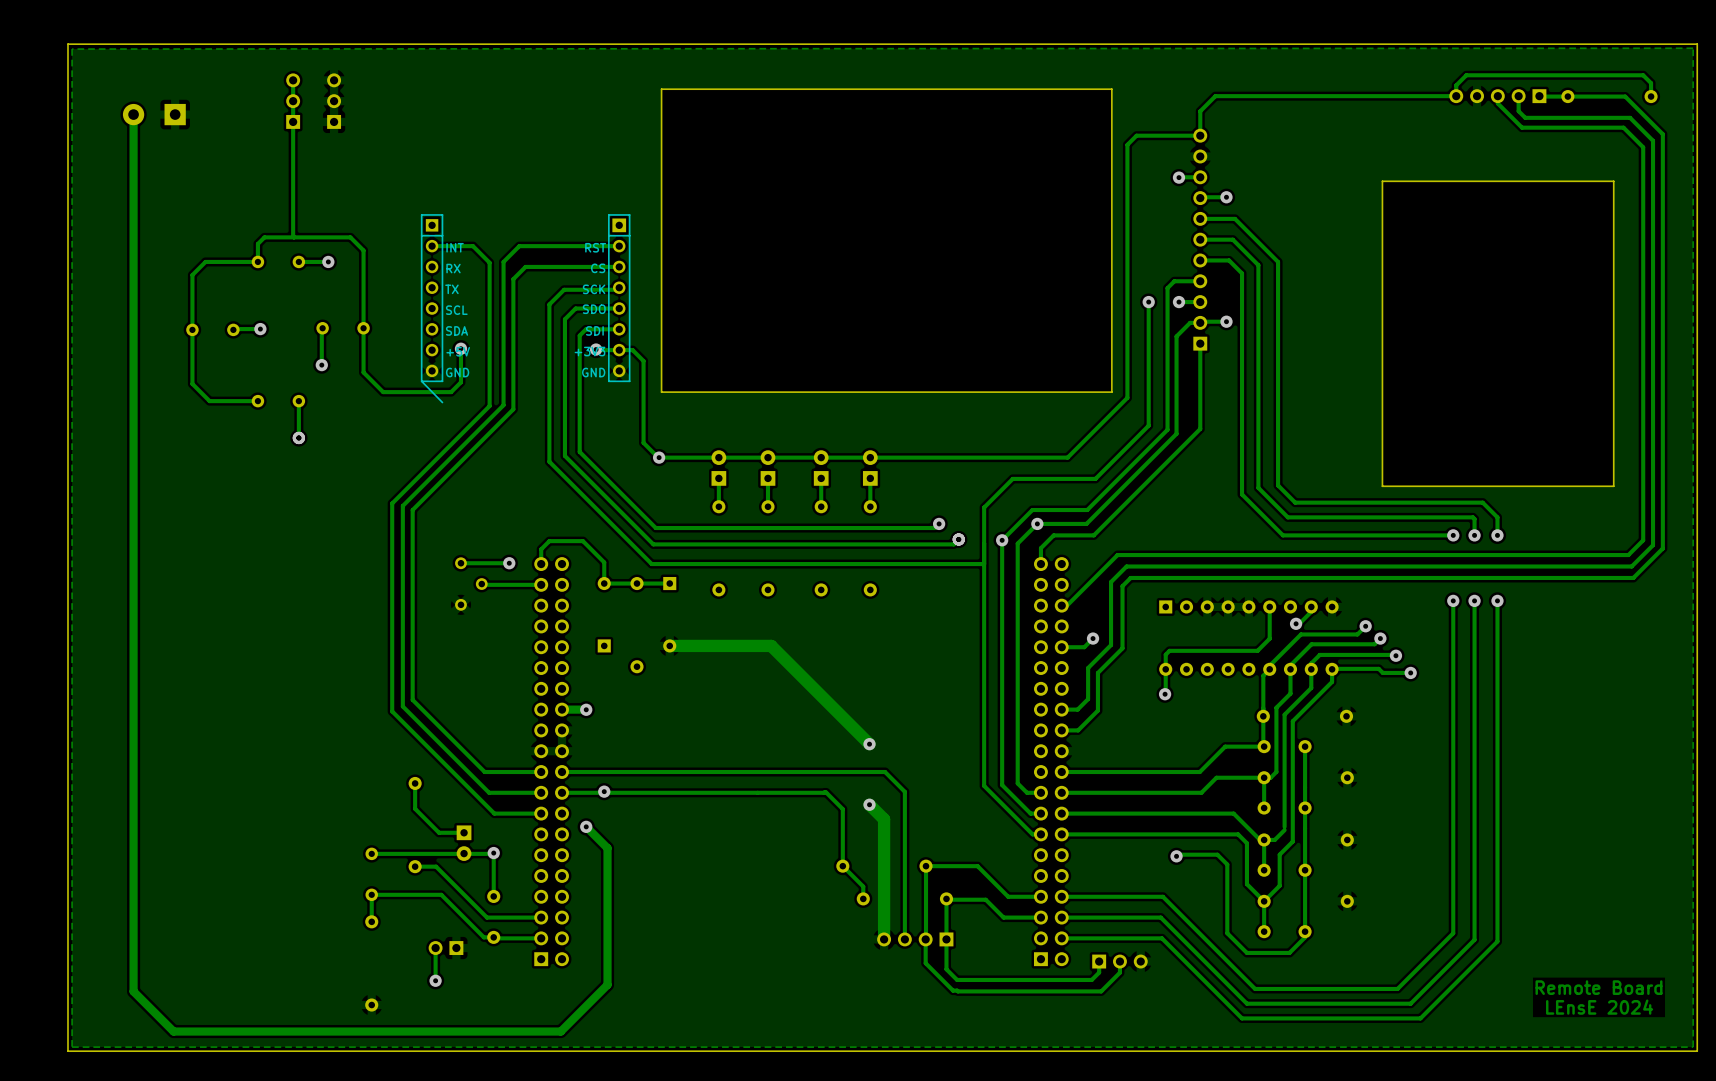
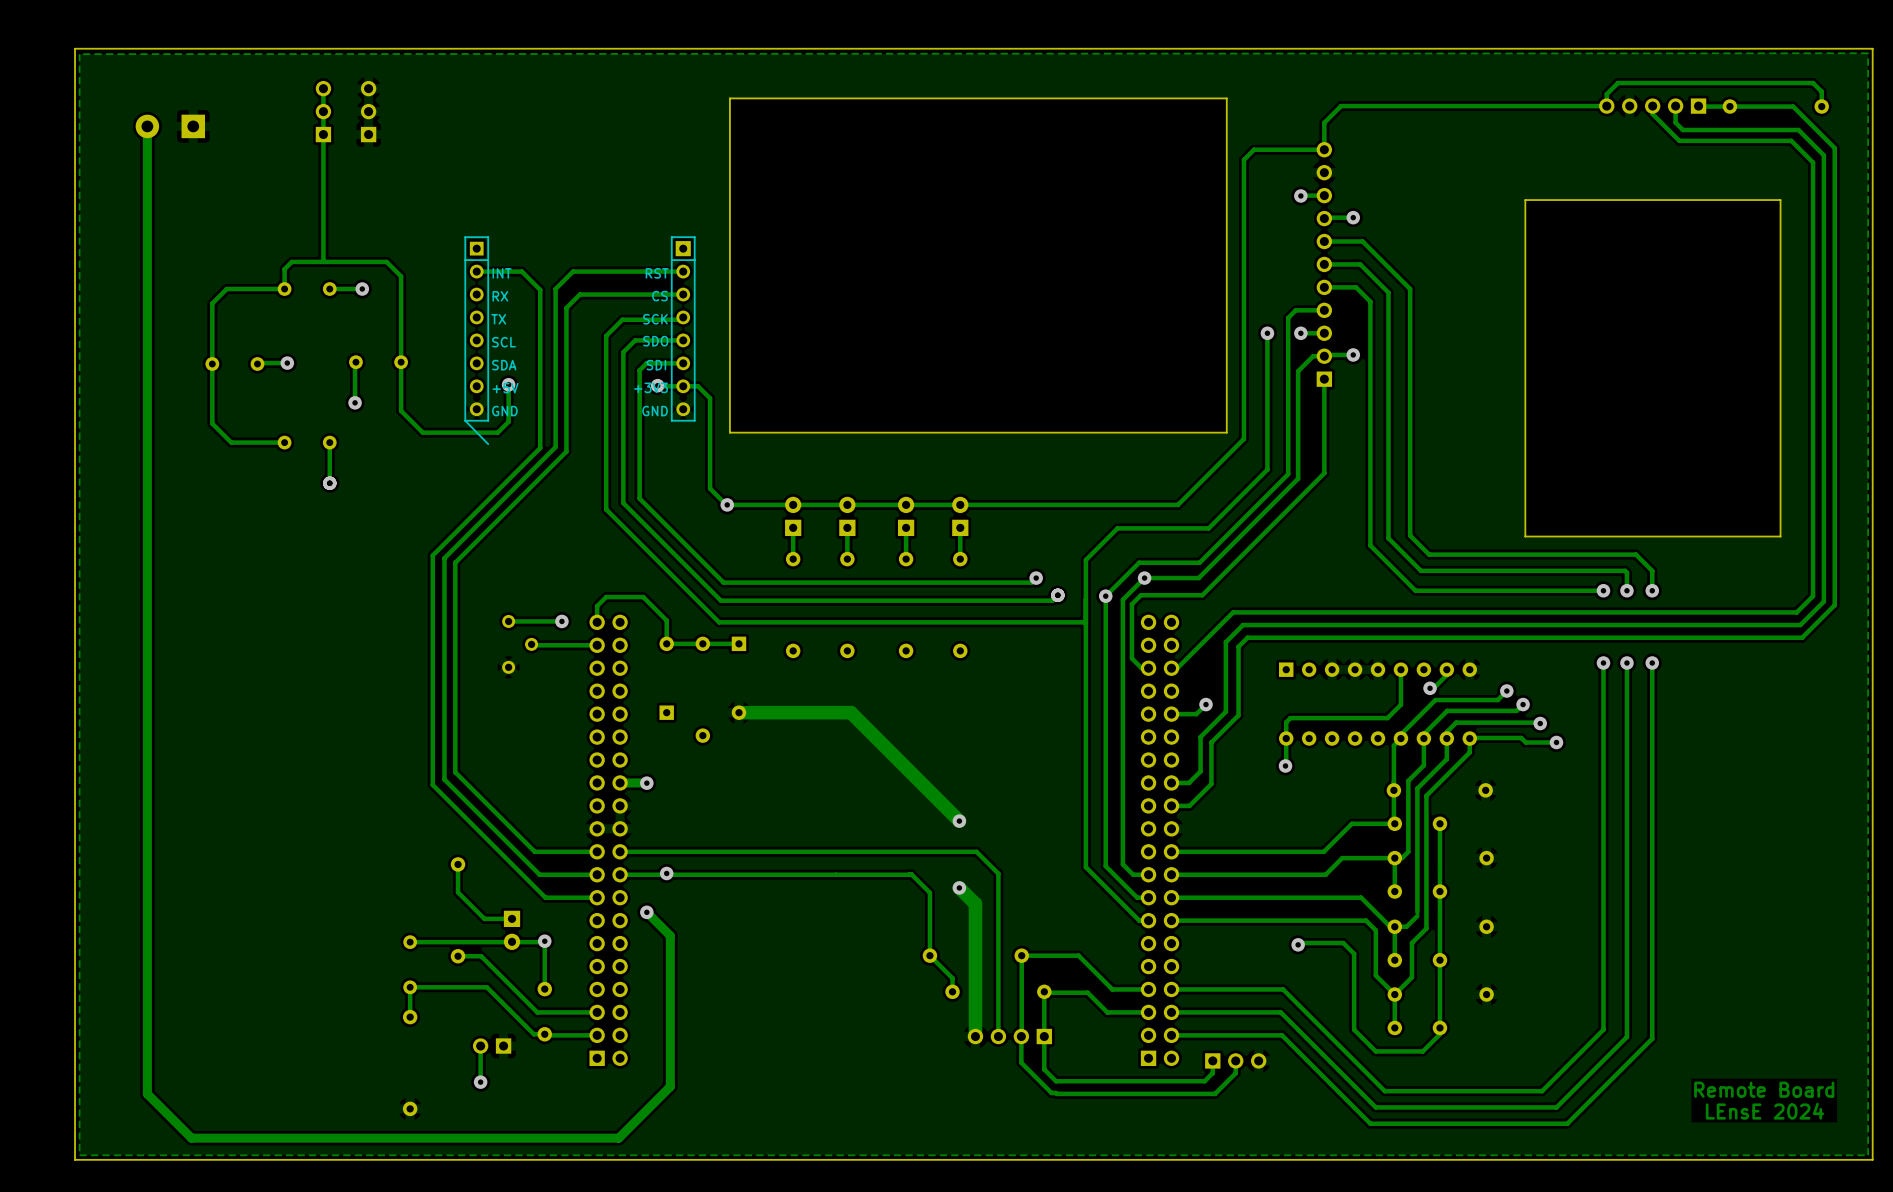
track: (1093, 535) (1053, 535) (1040, 548) (1040, 564) -> (1206, 590) (1202, 595) (1140, 595) (1131, 604) (1131, 658) (1141, 668) (1148, 668)

